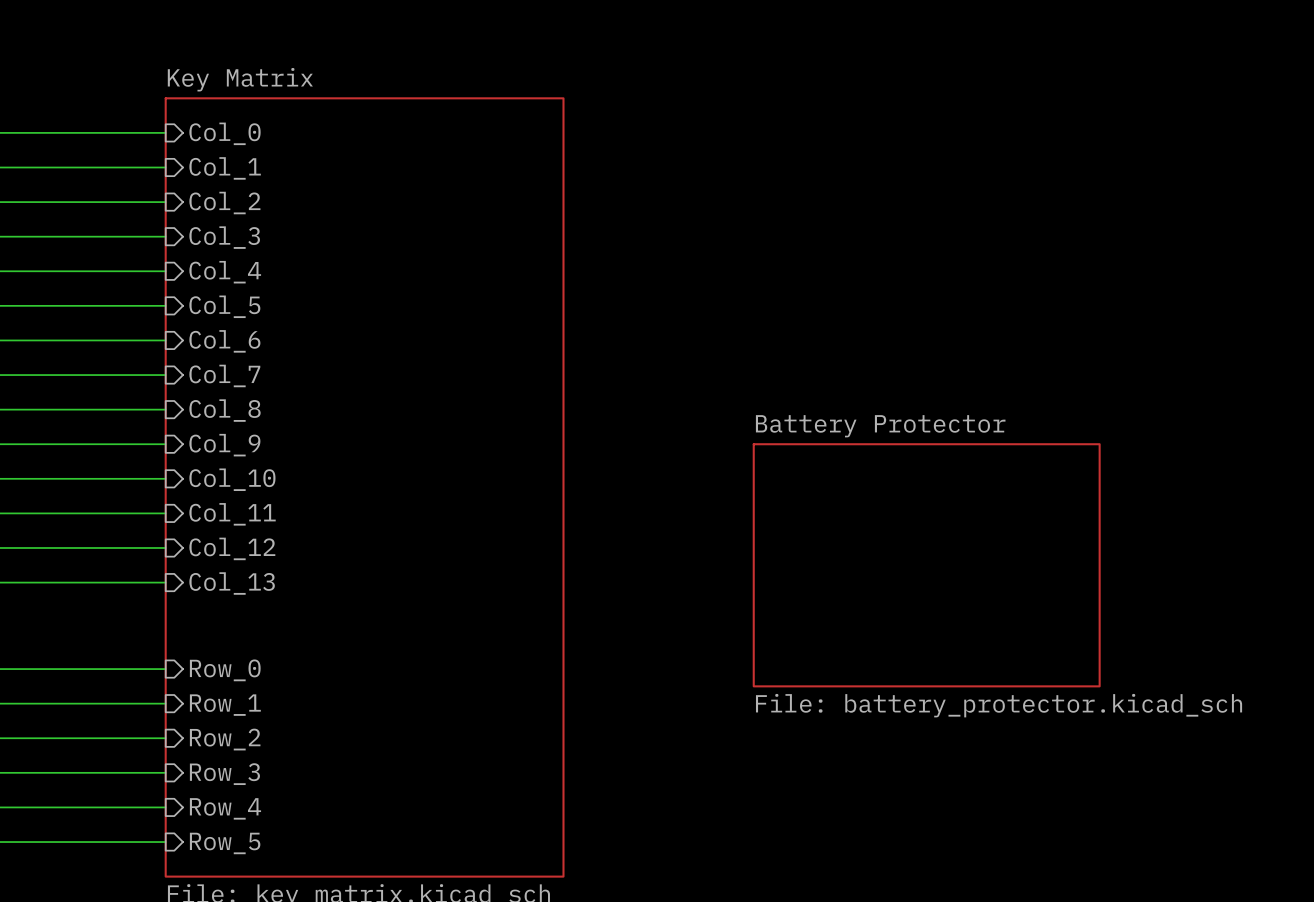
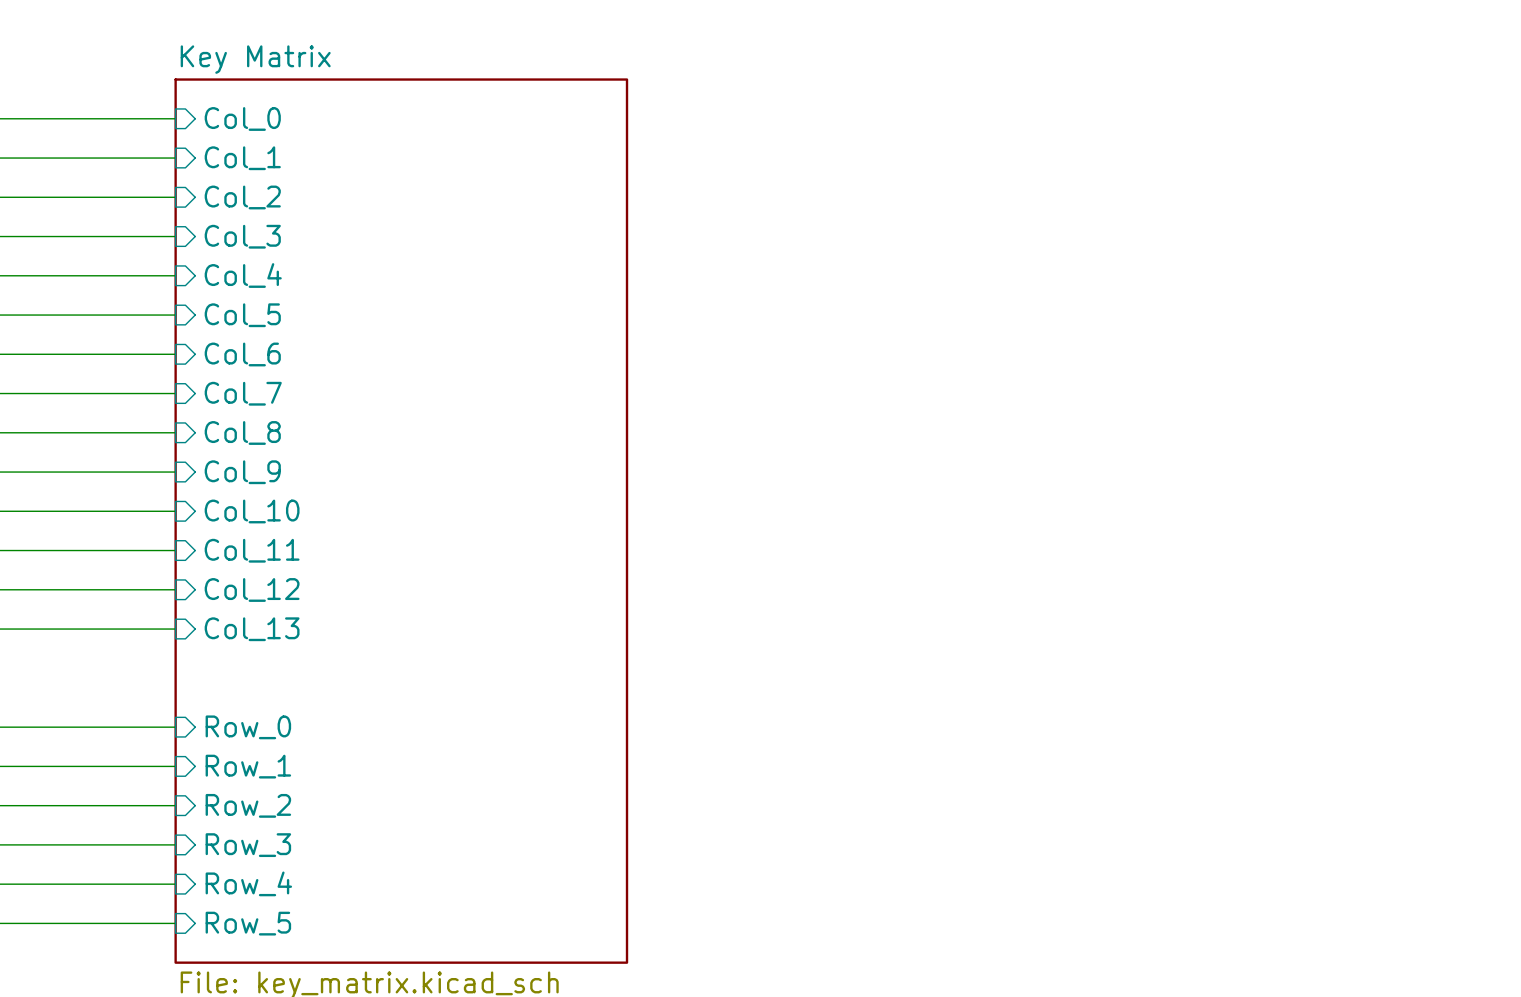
sheet Battery Protector: File: battery_protector.kicad_sch (926, 565) -> none

